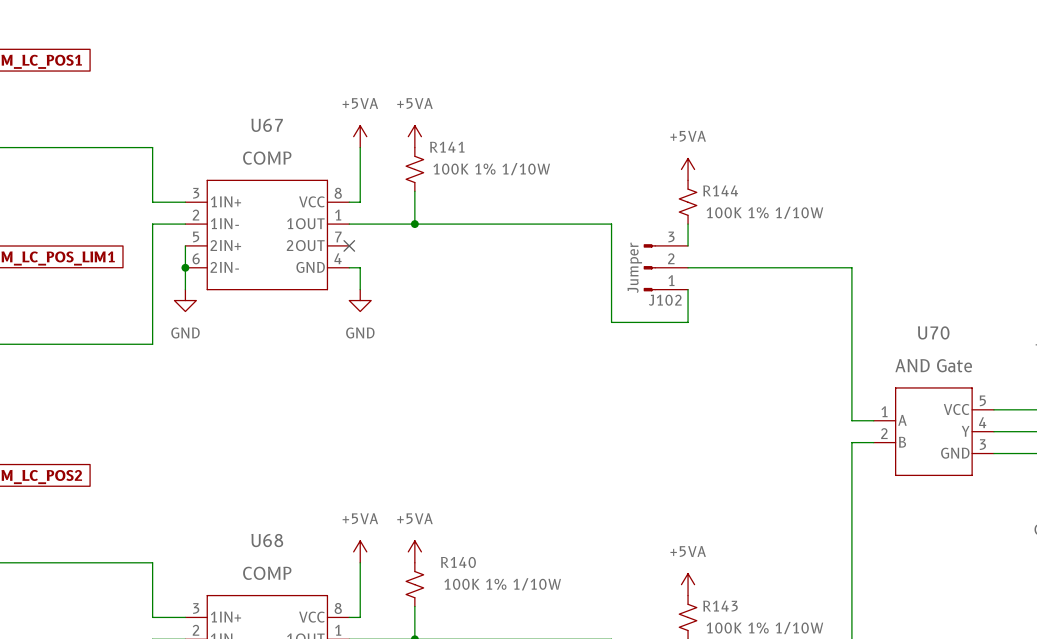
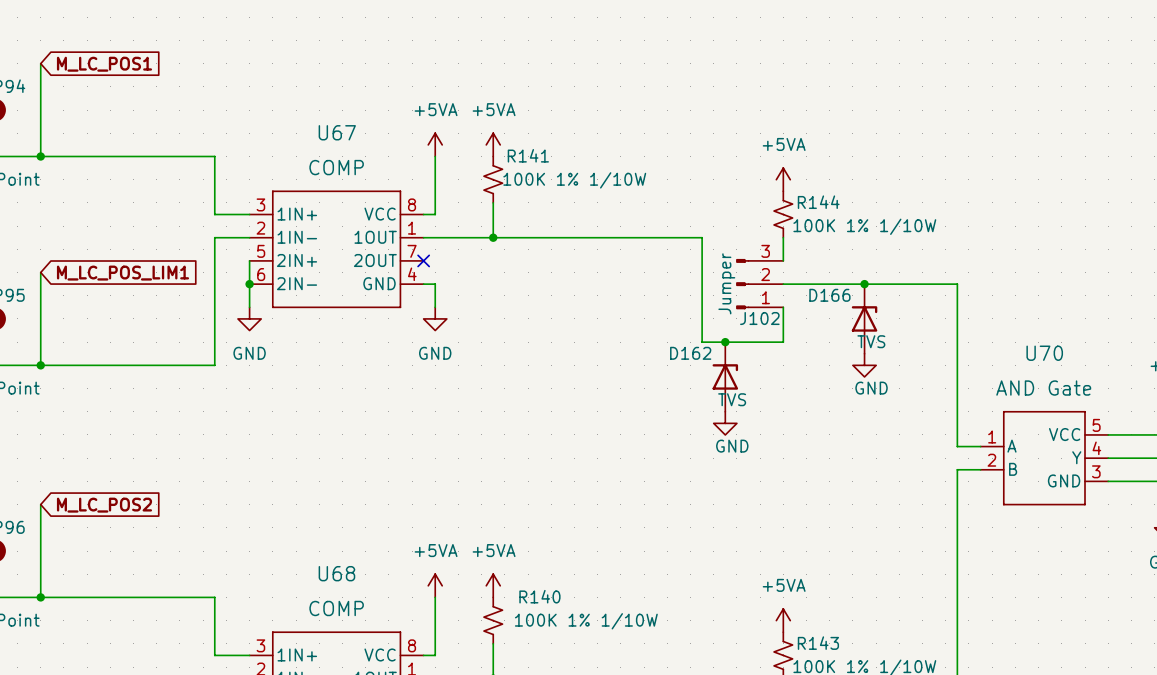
junction: none -> (864, 284)
D166: none -> TVS (864, 318)
junction: none -> (725, 342)
power symbol: none -> GND (864, 365)
D162: none -> TVS (725, 376)
power symbol: none -> GND (725, 423)

